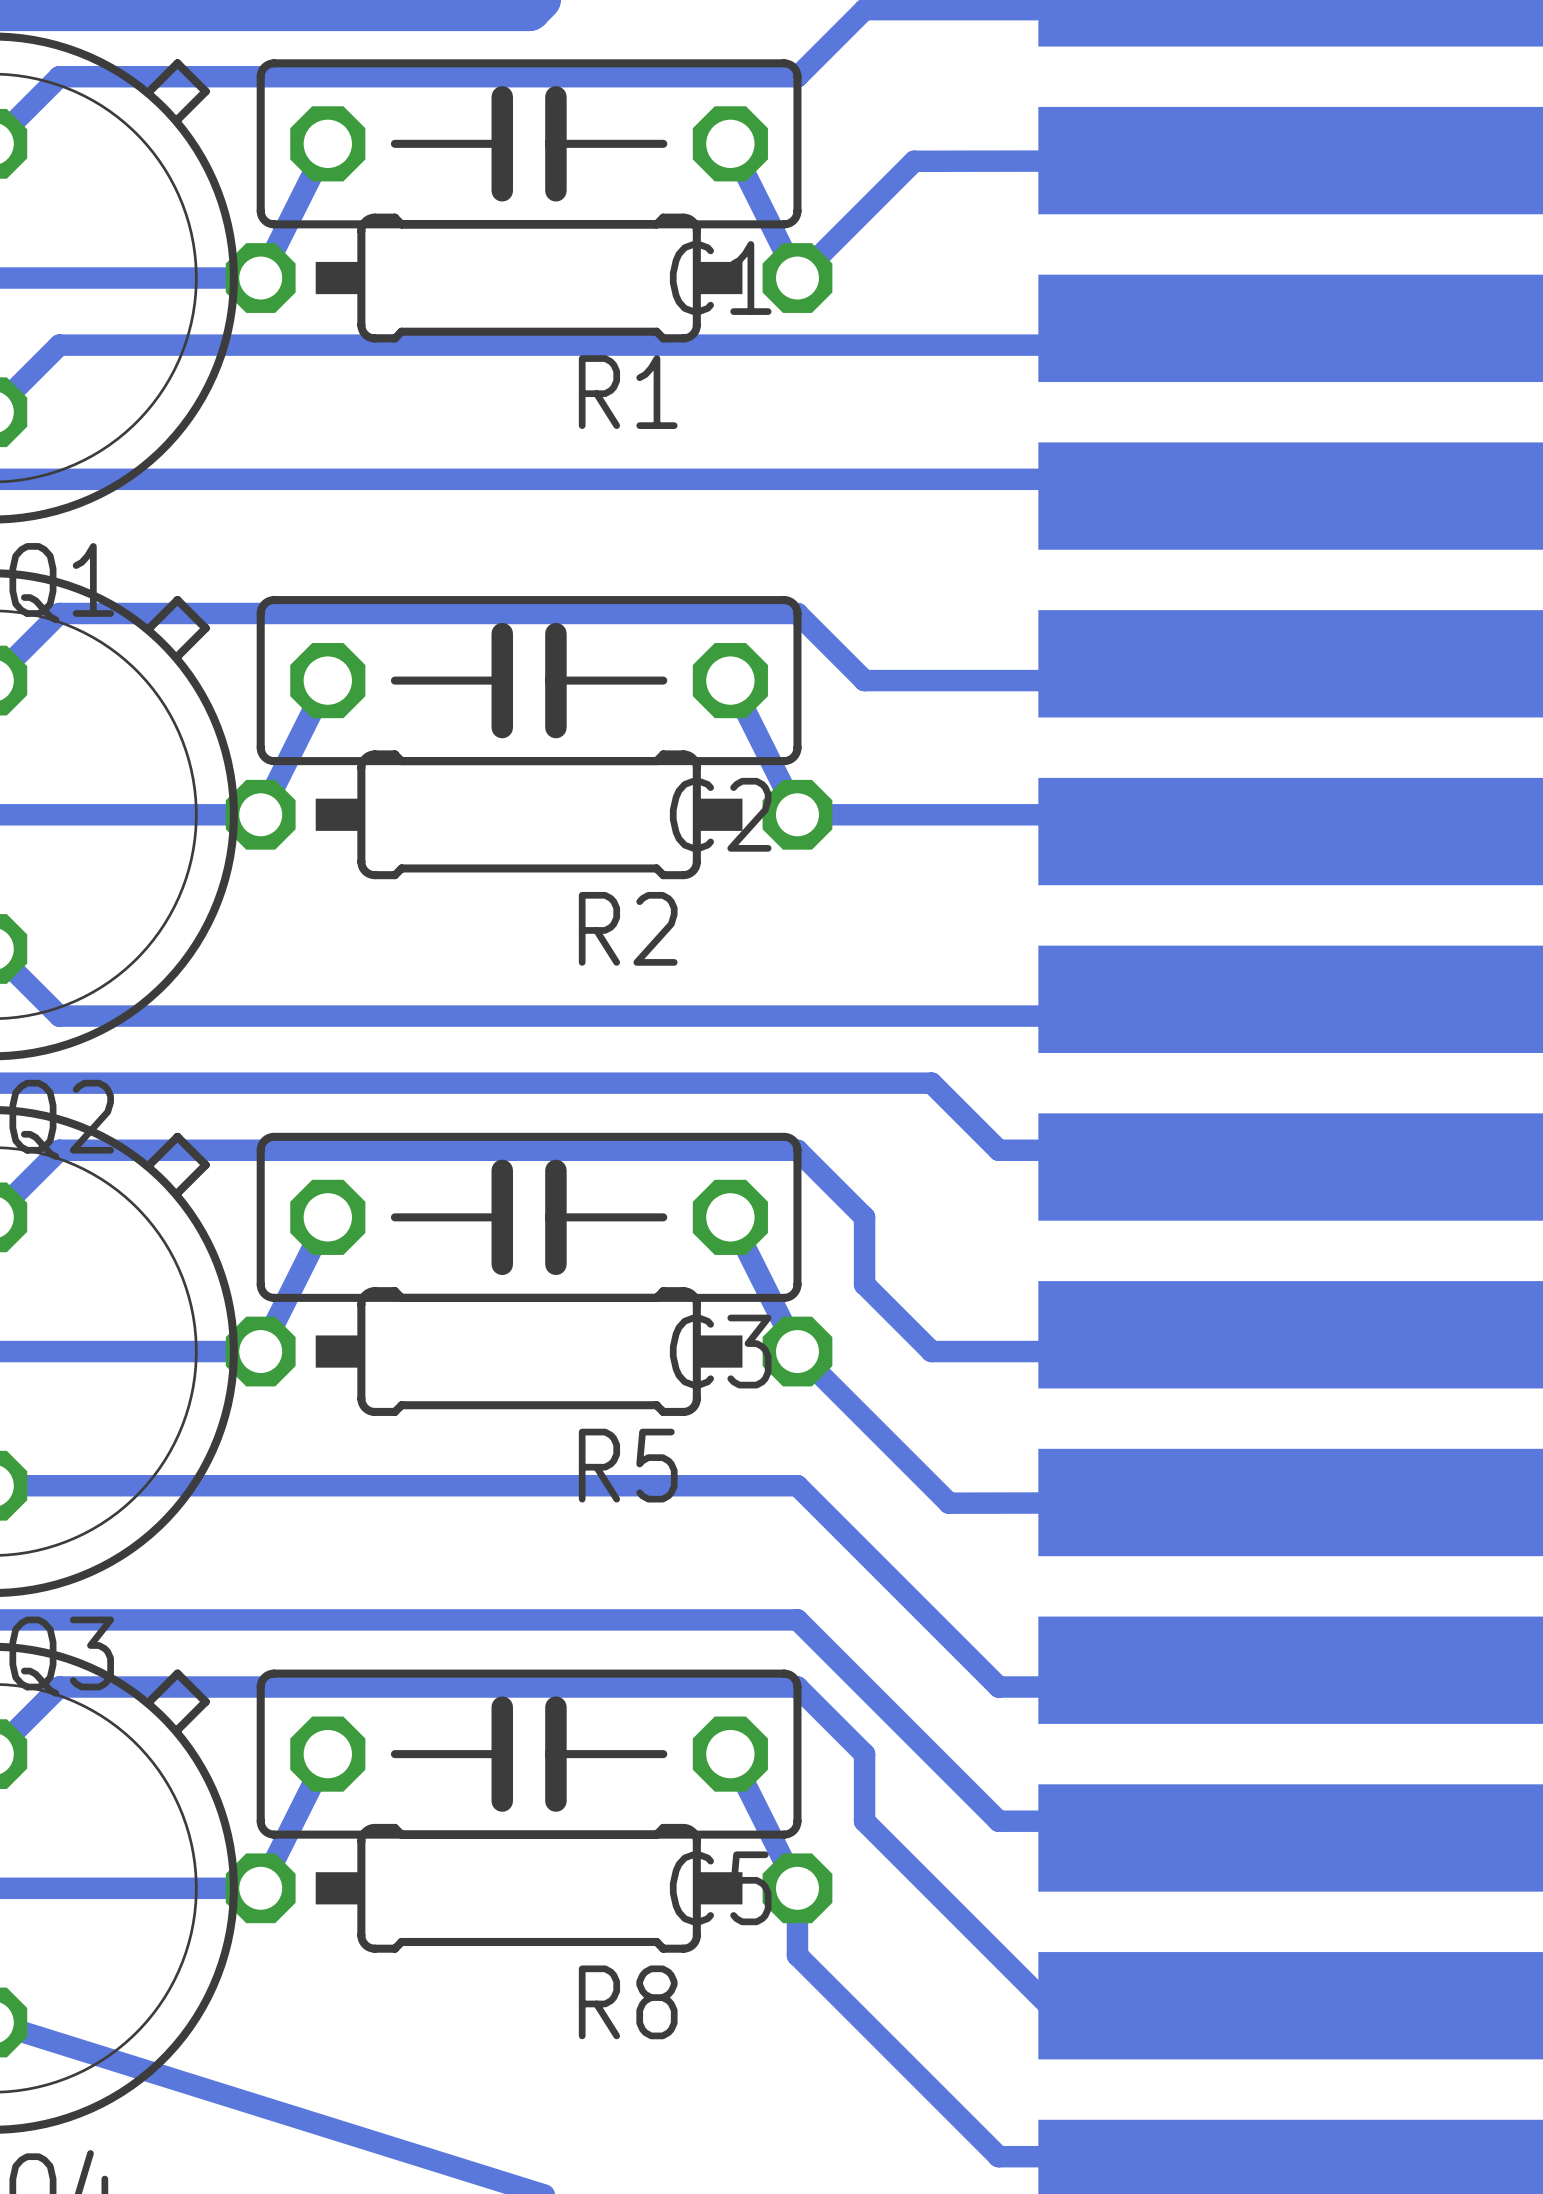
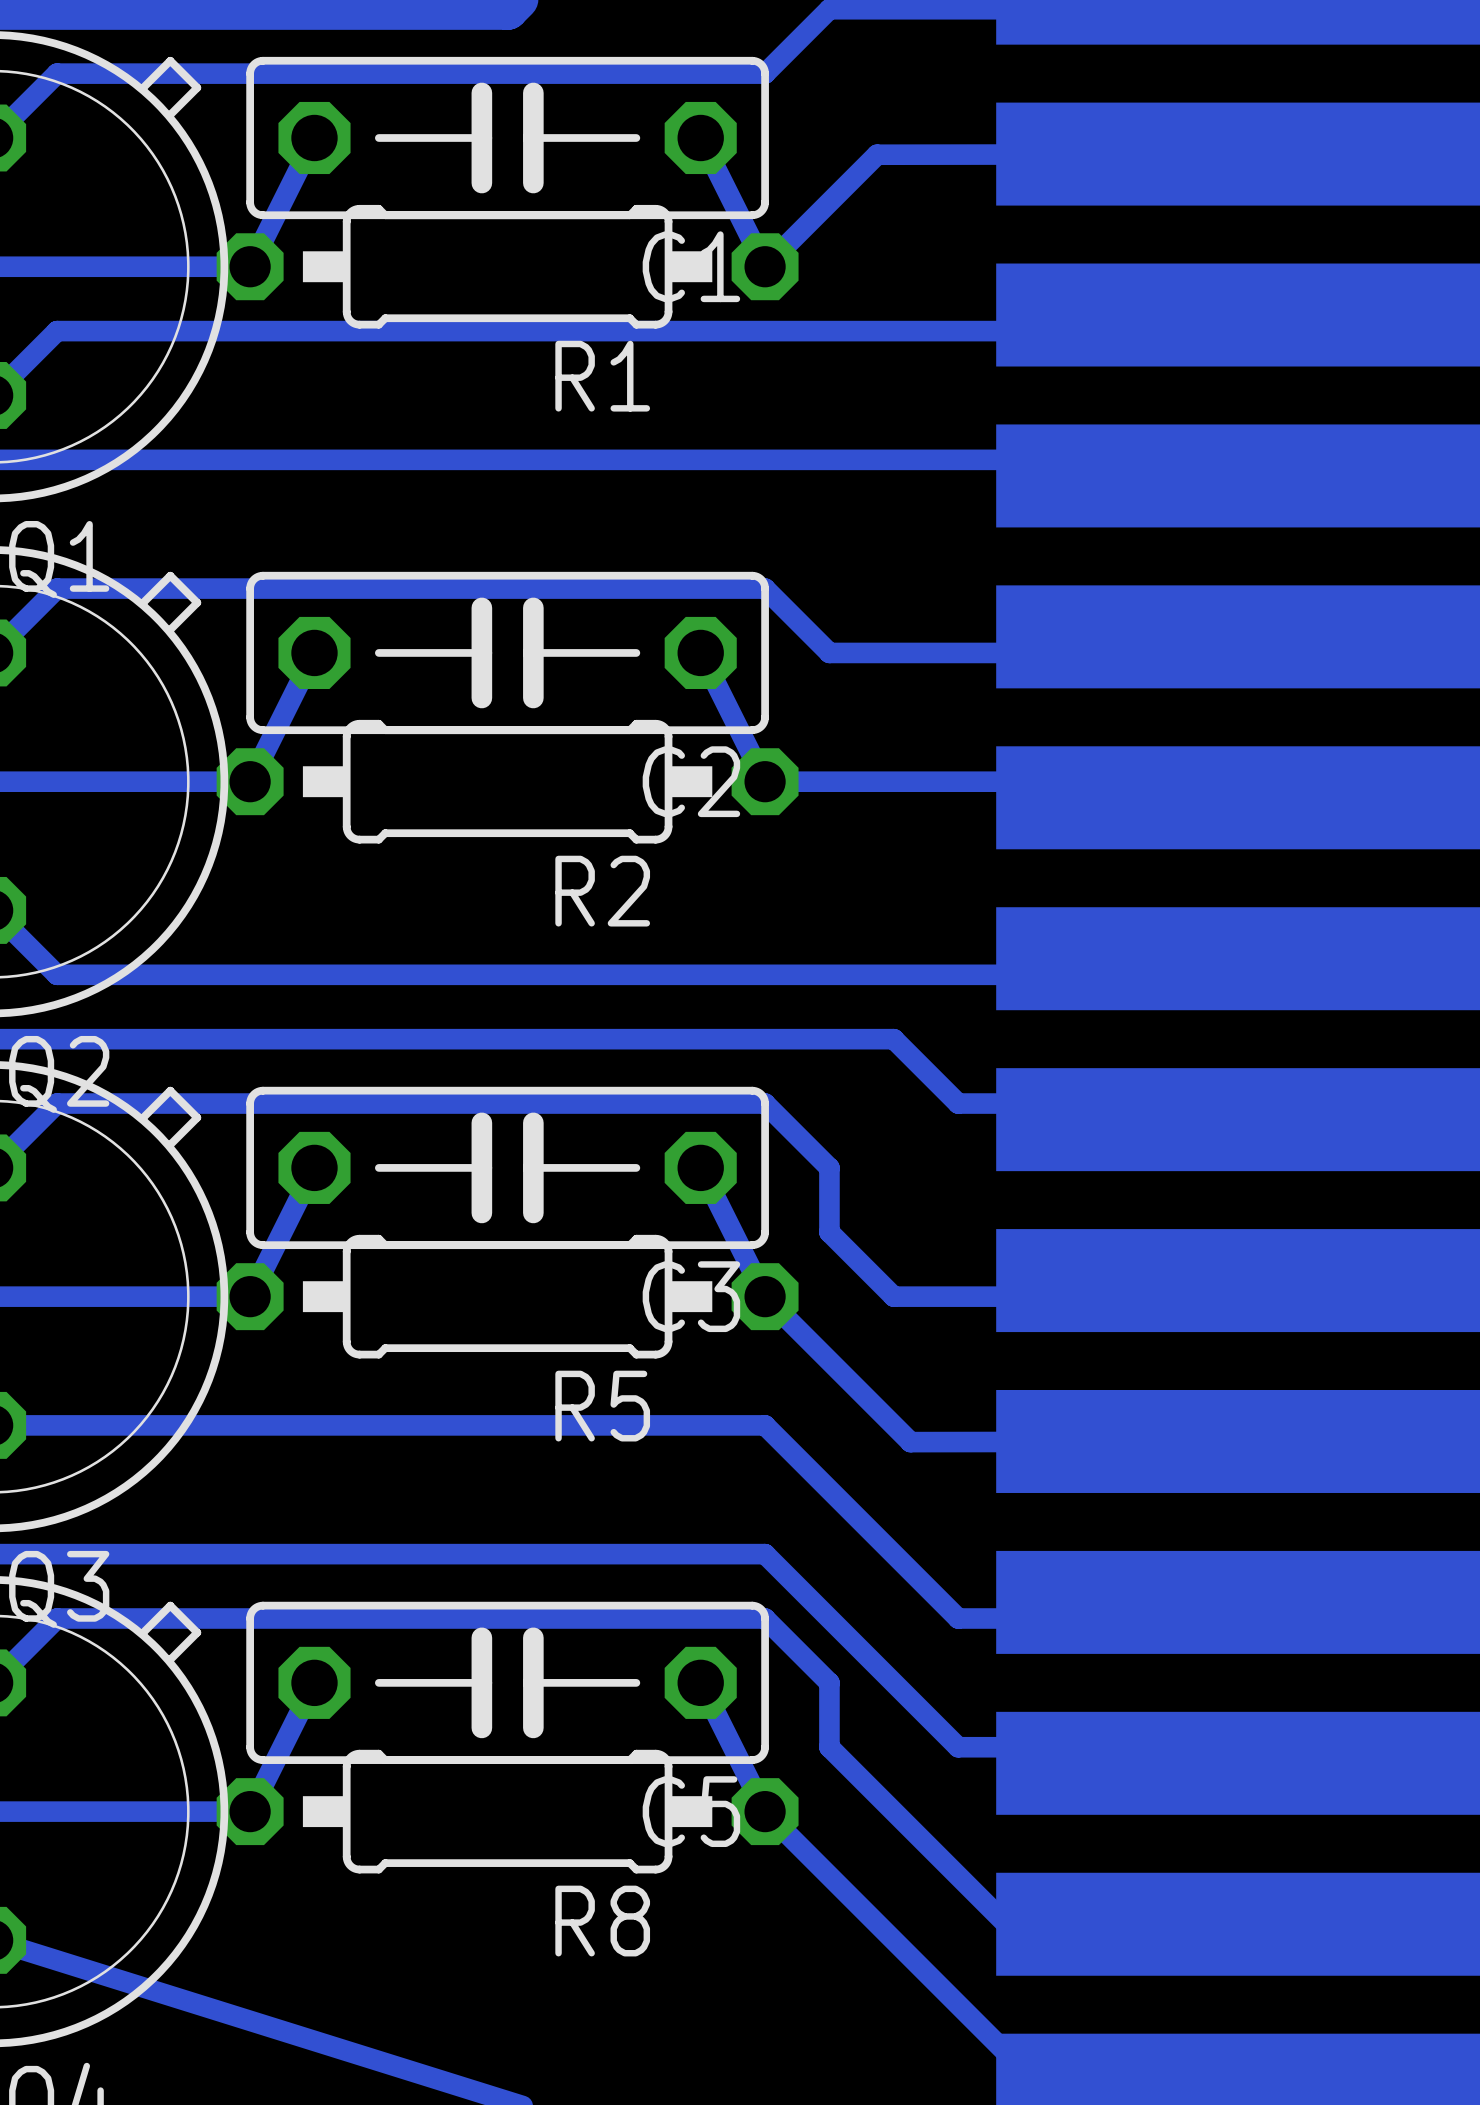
bottom track: (797, 1888) (797, 1955) (998, 2156) (1065, 2156) -> (765, 1811) (1022, 2069)

